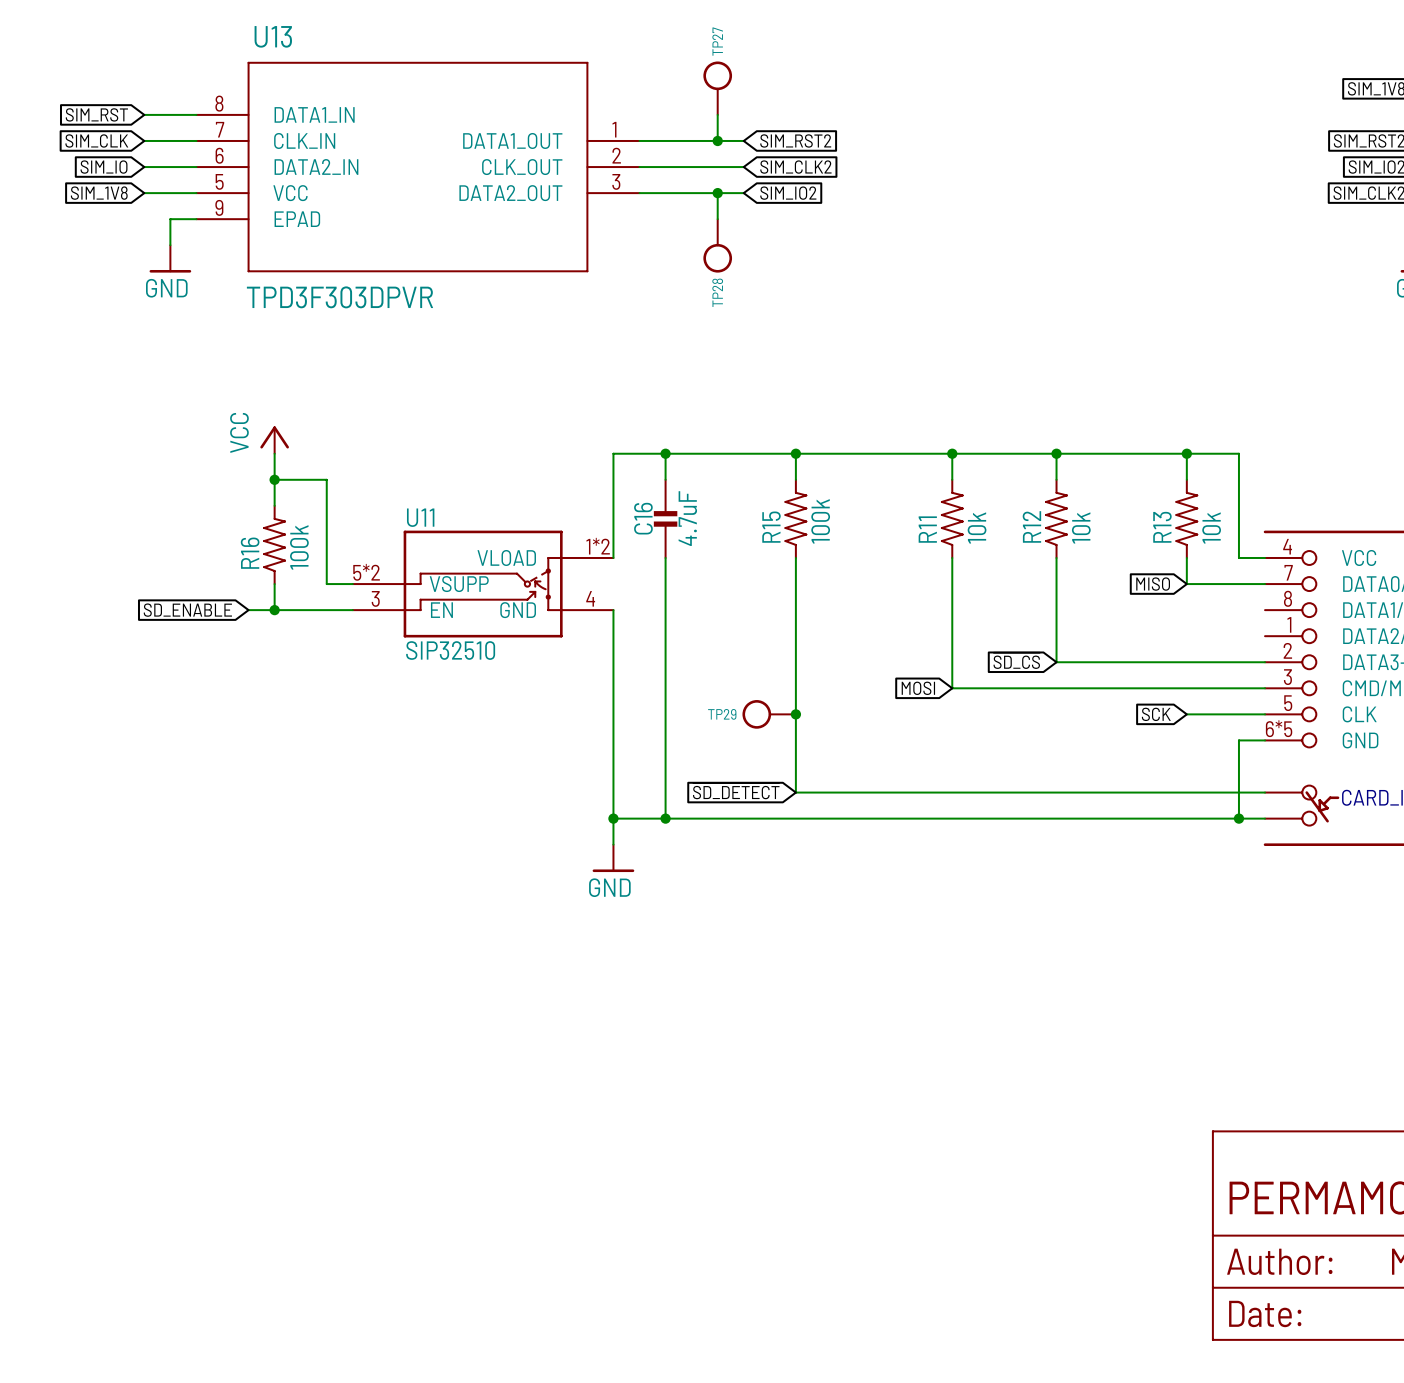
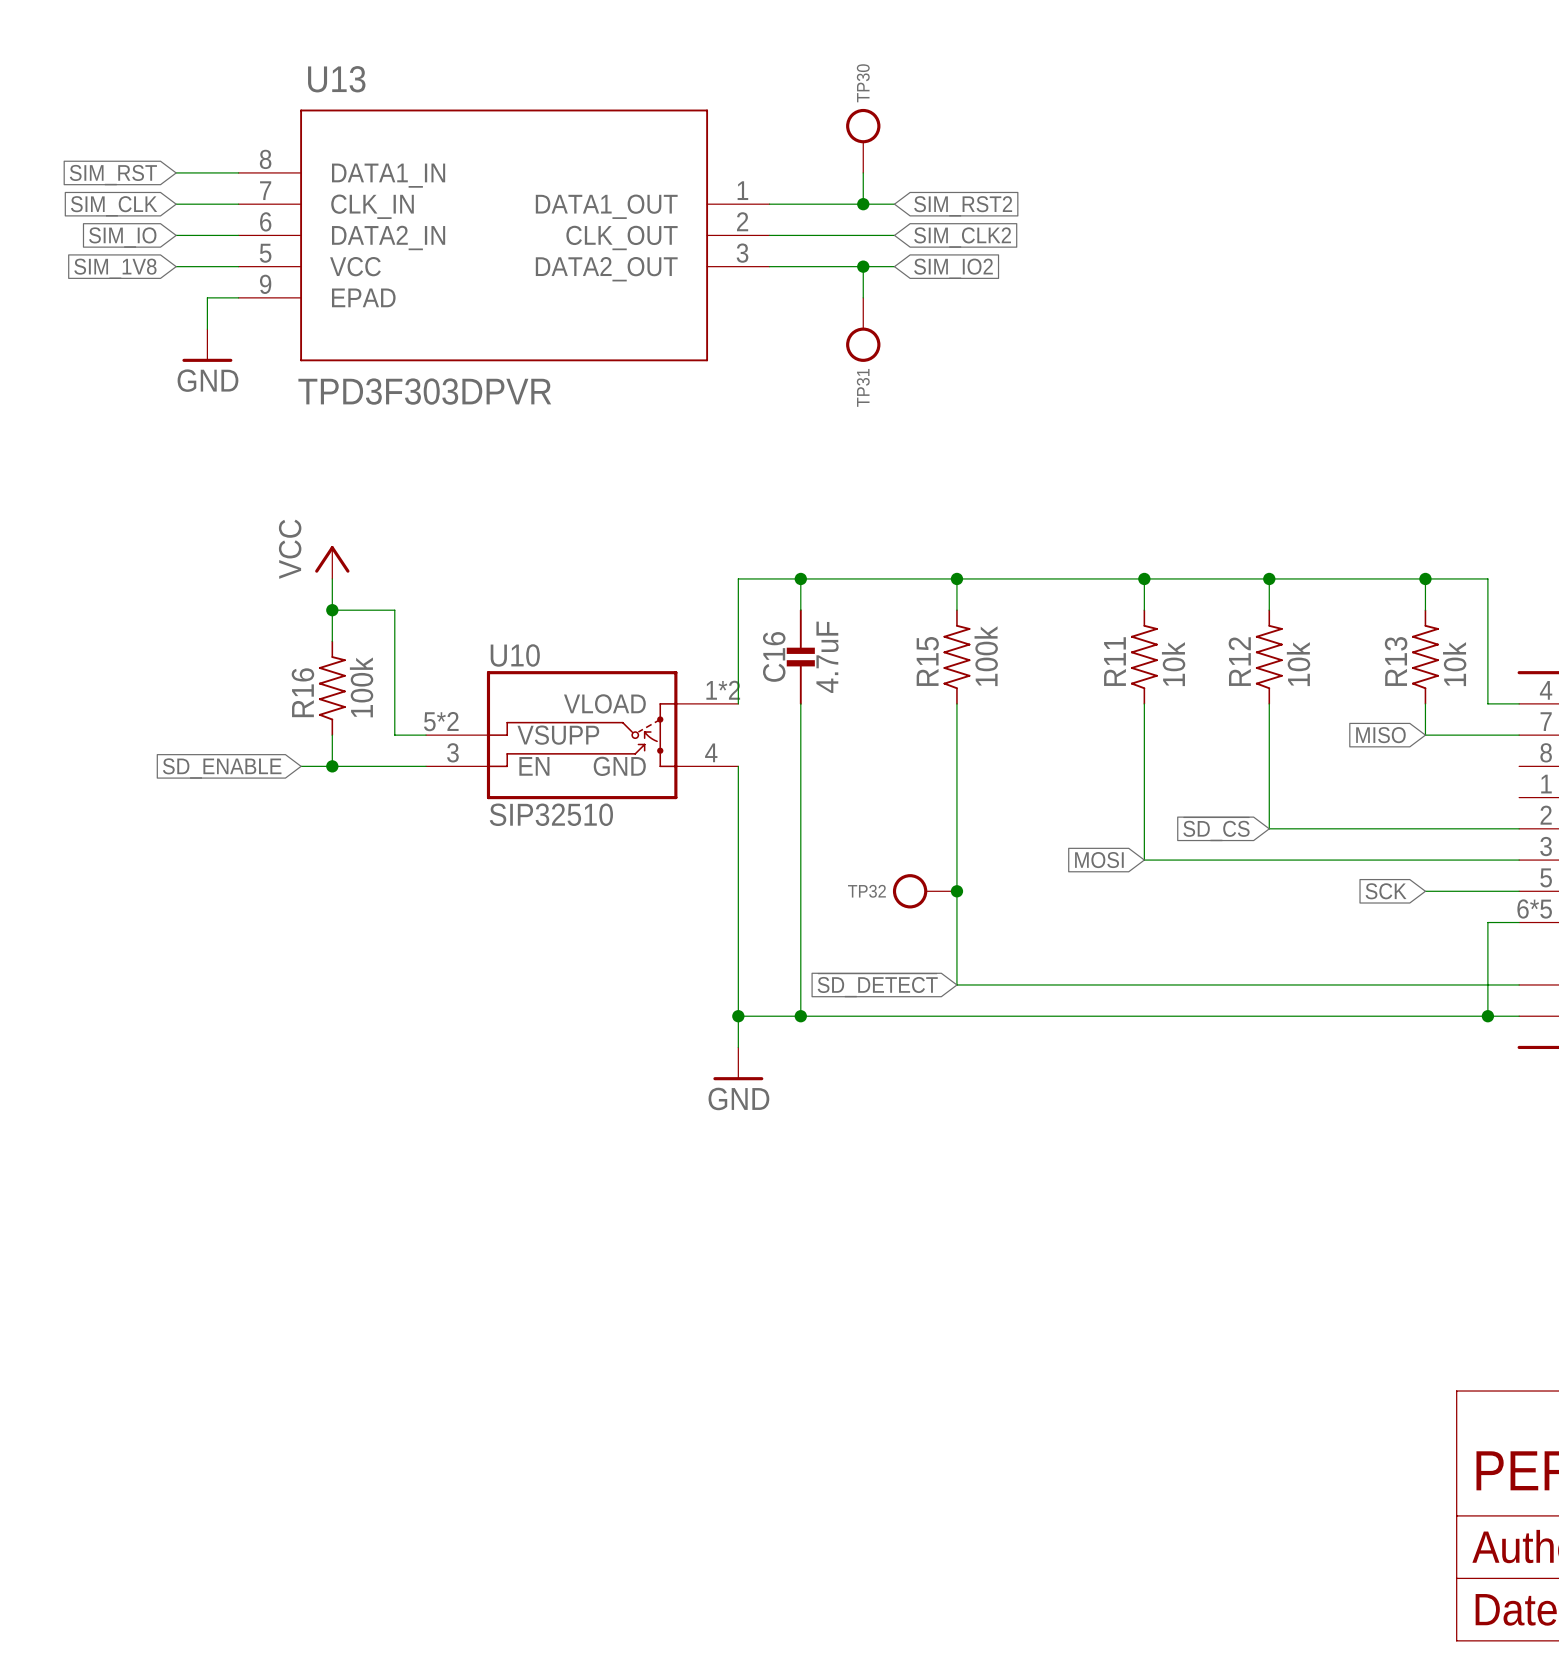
TP27 name: TP27 (717, 41) -> TP30 (863, 83)
TP28 name: TP28 (717, 292) -> TP31 (863, 387)
U11 name: U11 (420, 517) -> U10 (515, 655)
TP29 name: TP29 (722, 714) -> TP32 (866, 891)

